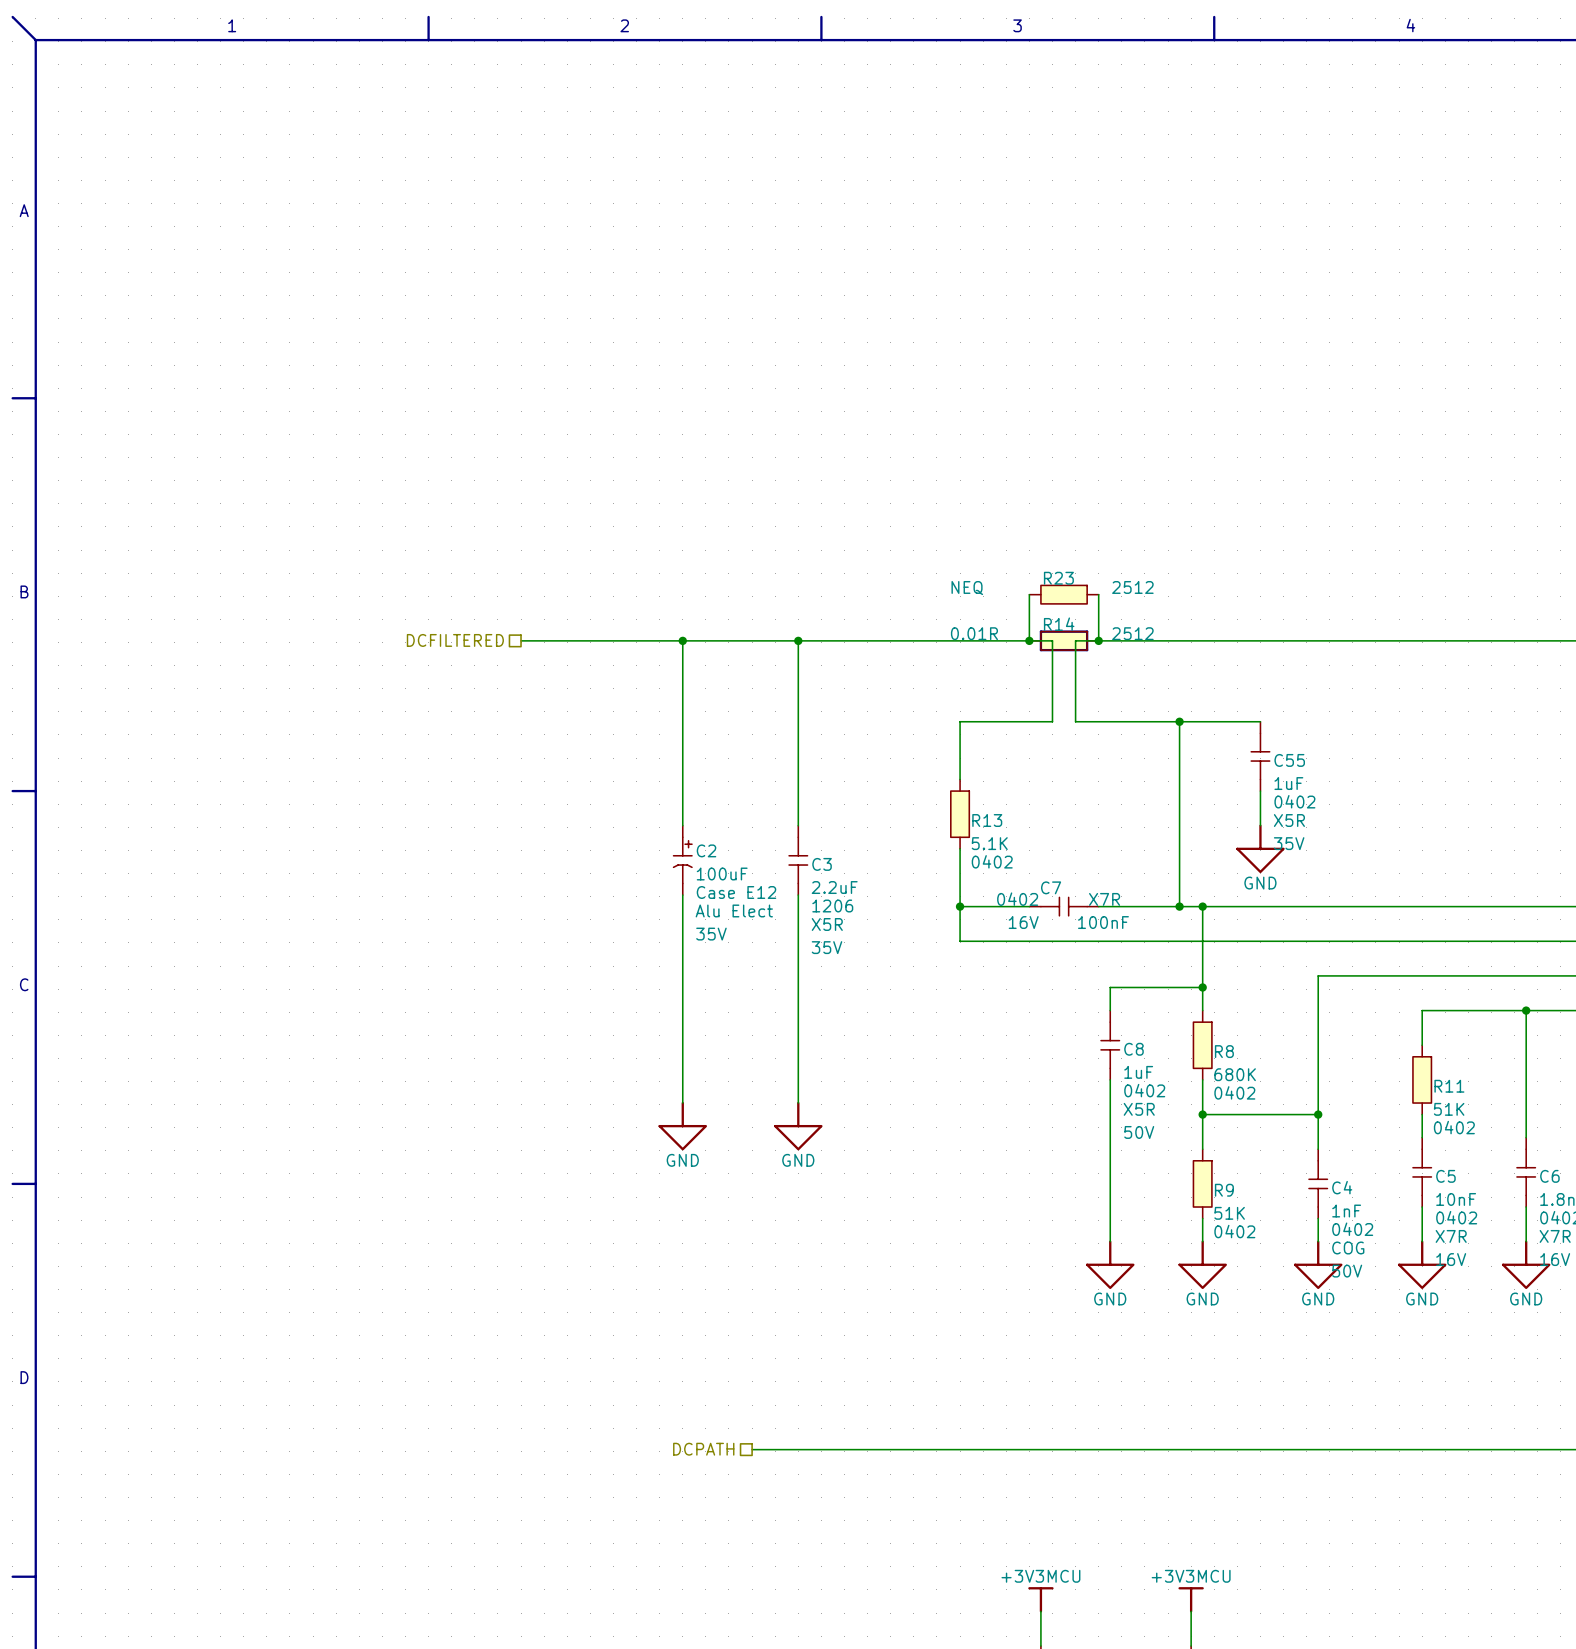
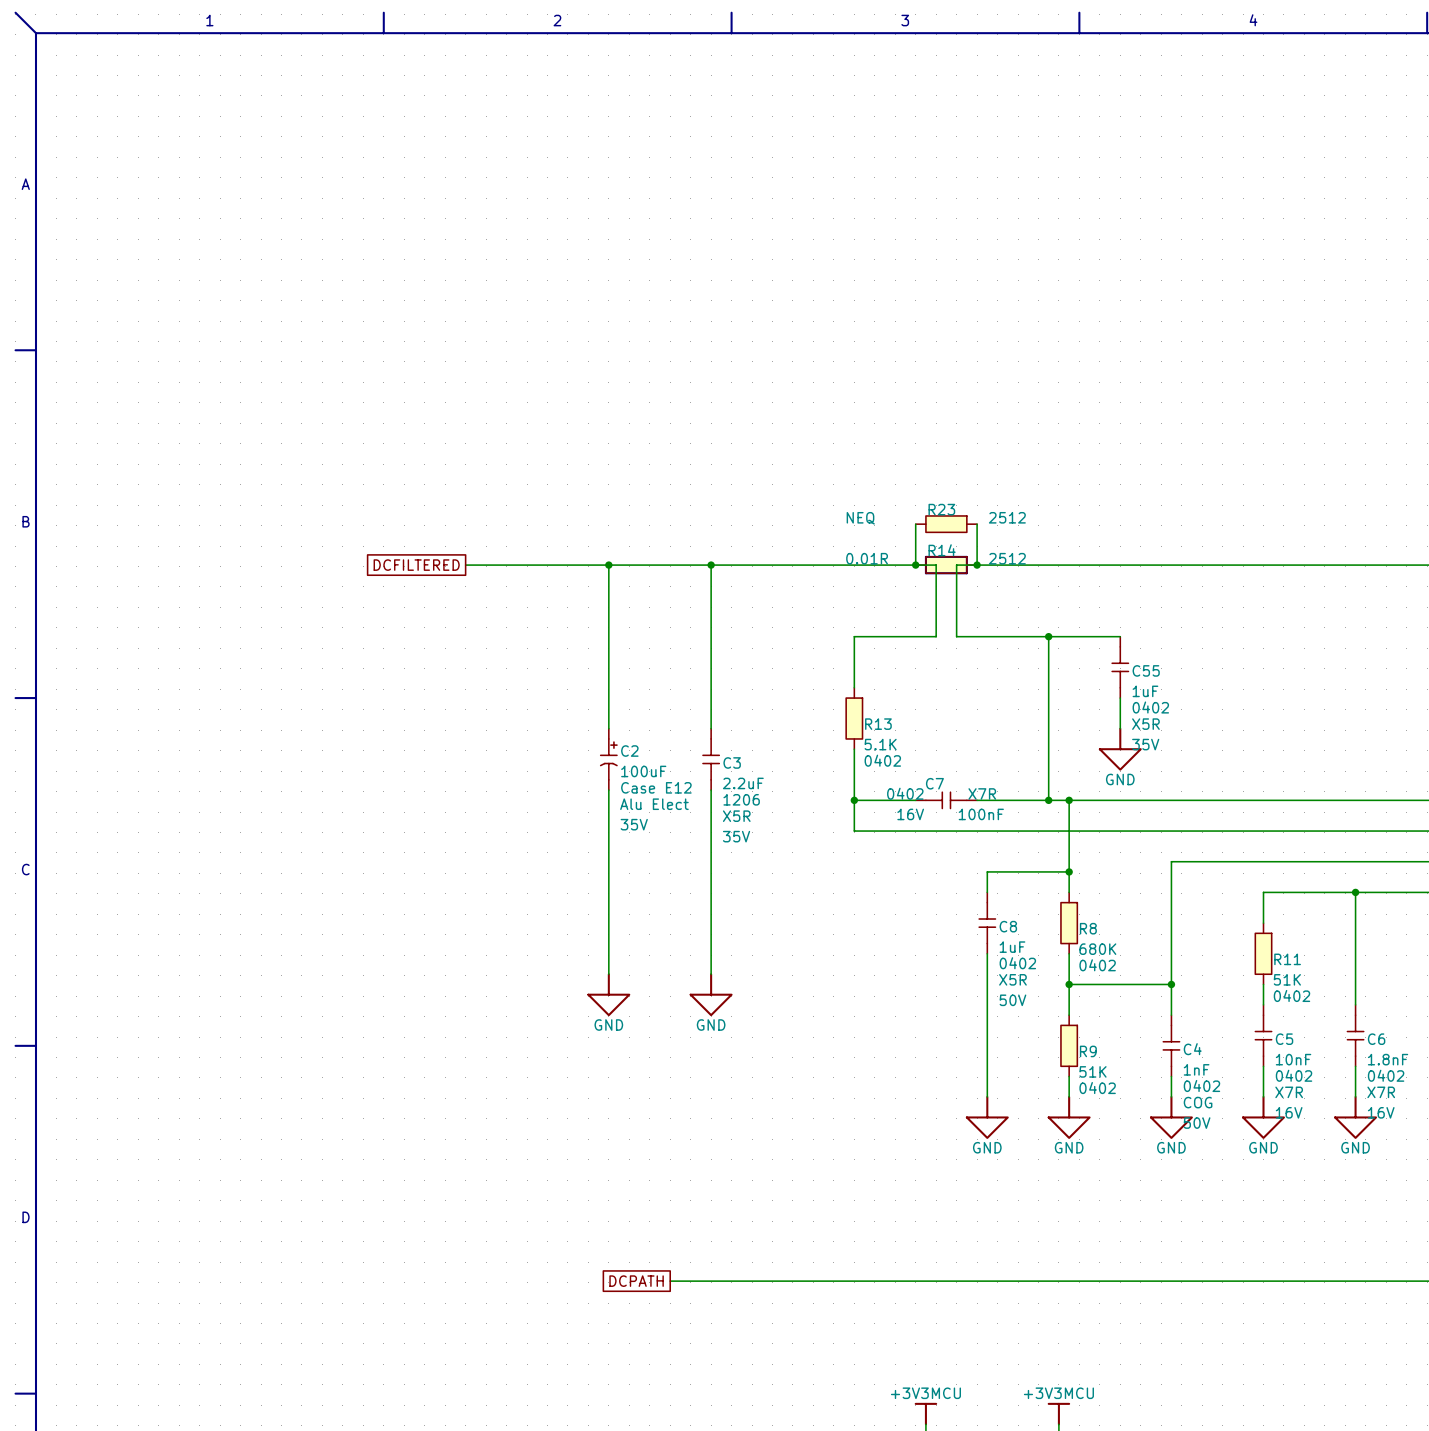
hierarchical label: DCFILTERED (455, 640) -> none
global label: none -> DCFILTERED (416, 565)
hierarchical label: DCPATH (703, 1449) -> none
global label: none -> DCPATH (636, 1281)

